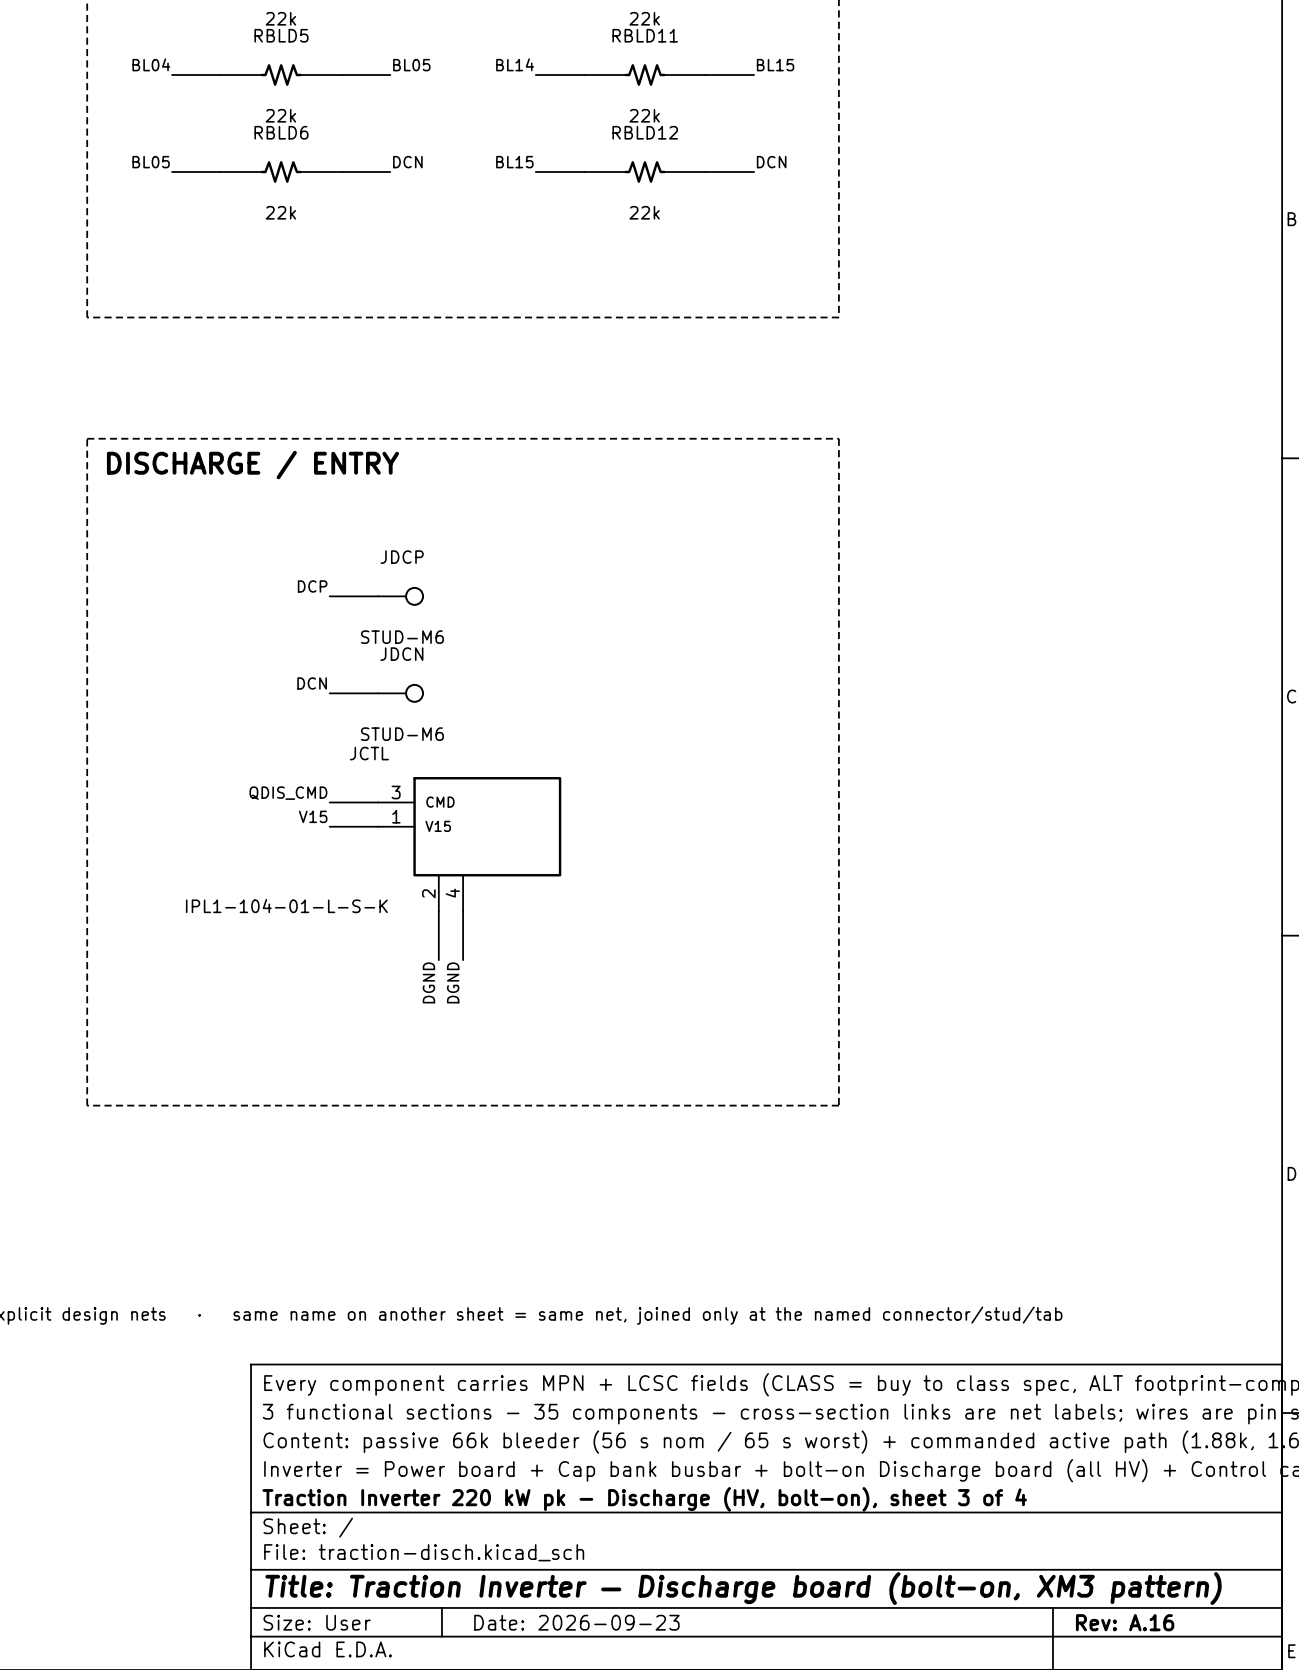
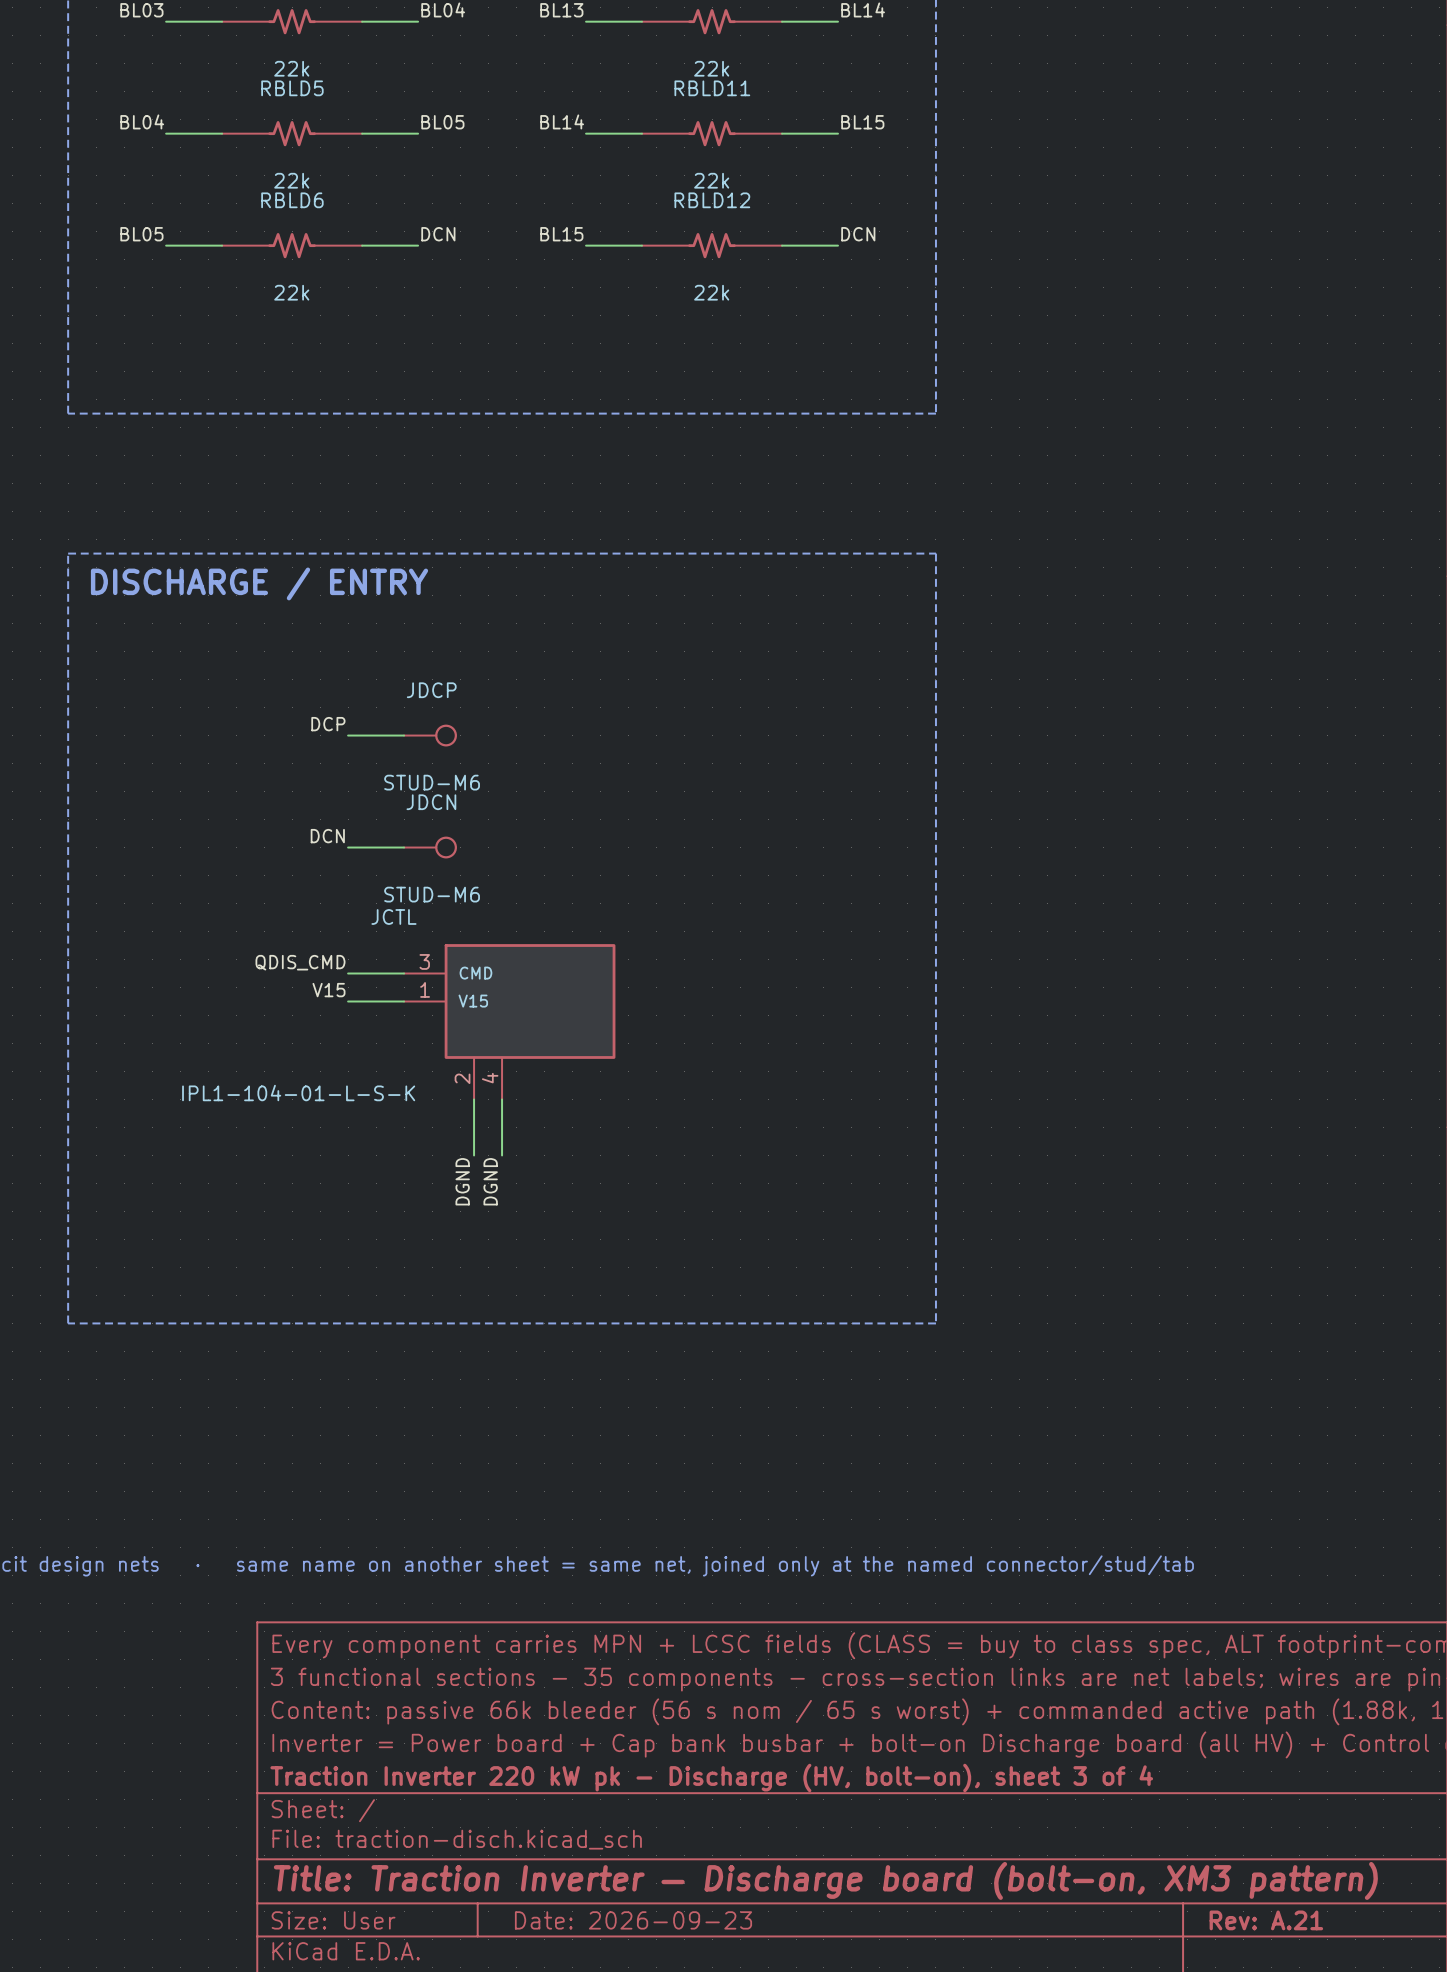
title block: Rev: A.16 (1125, 1622) -> Rev: A.21 (1266, 1920)

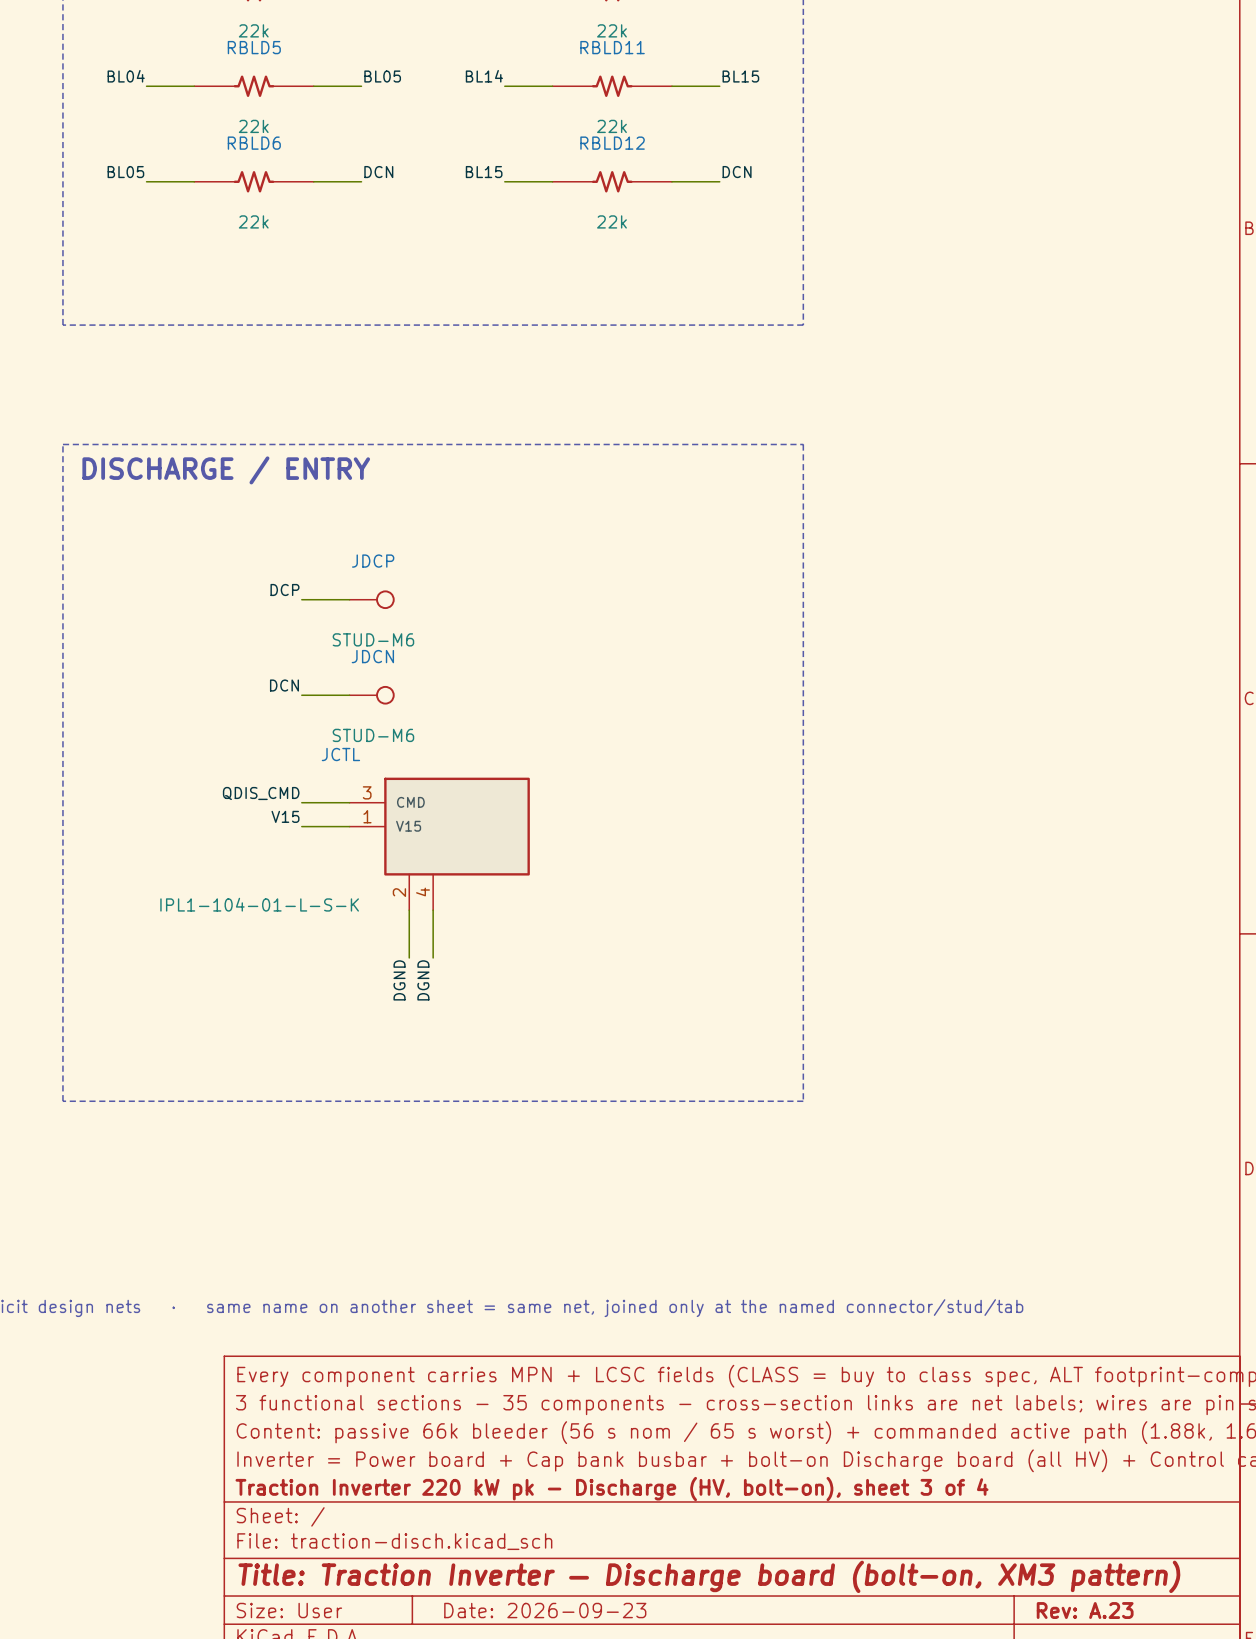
title block: Rev: A.21 (1266, 1920) -> Rev: A.23 (1085, 1610)

